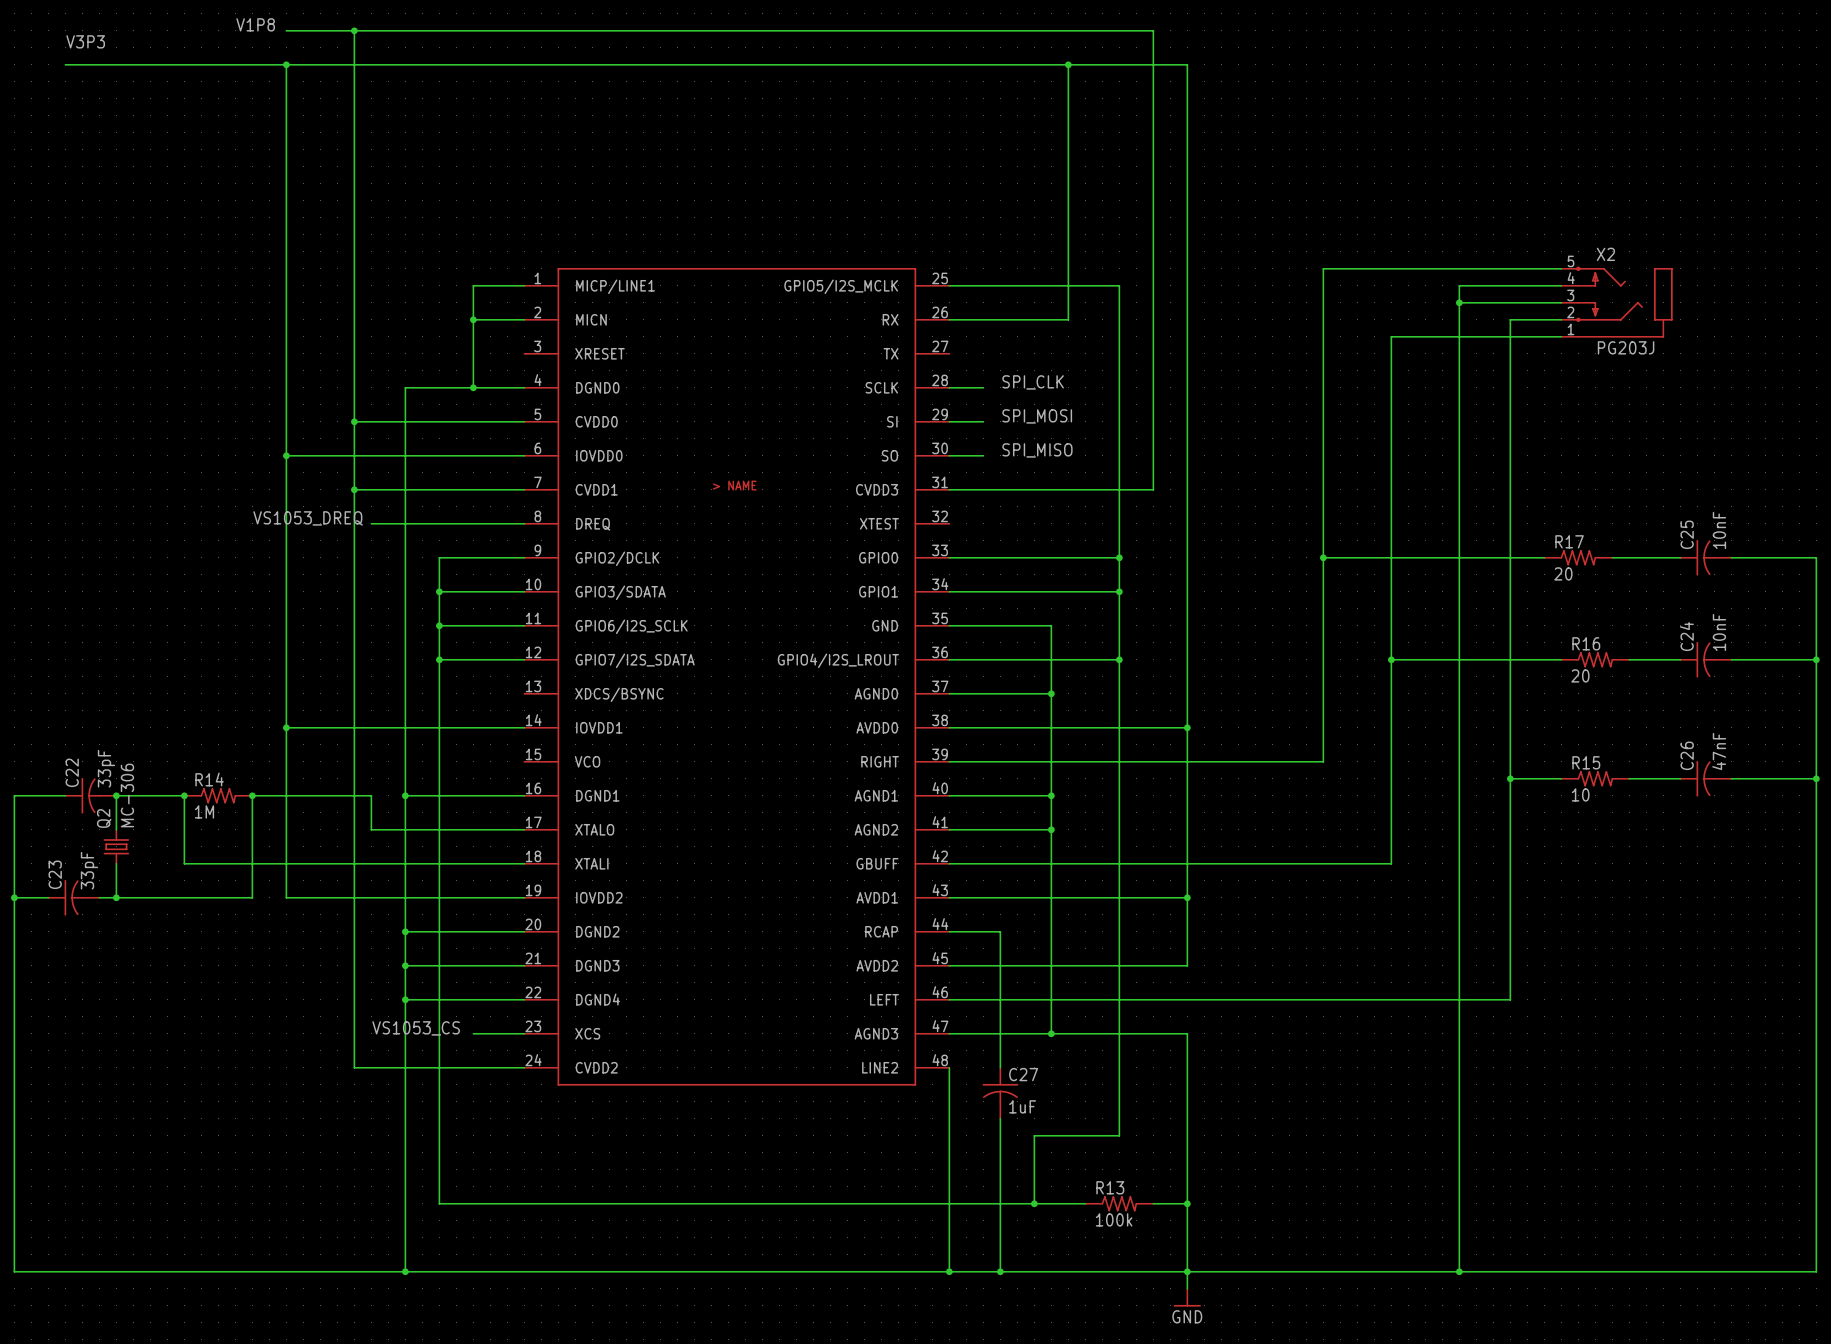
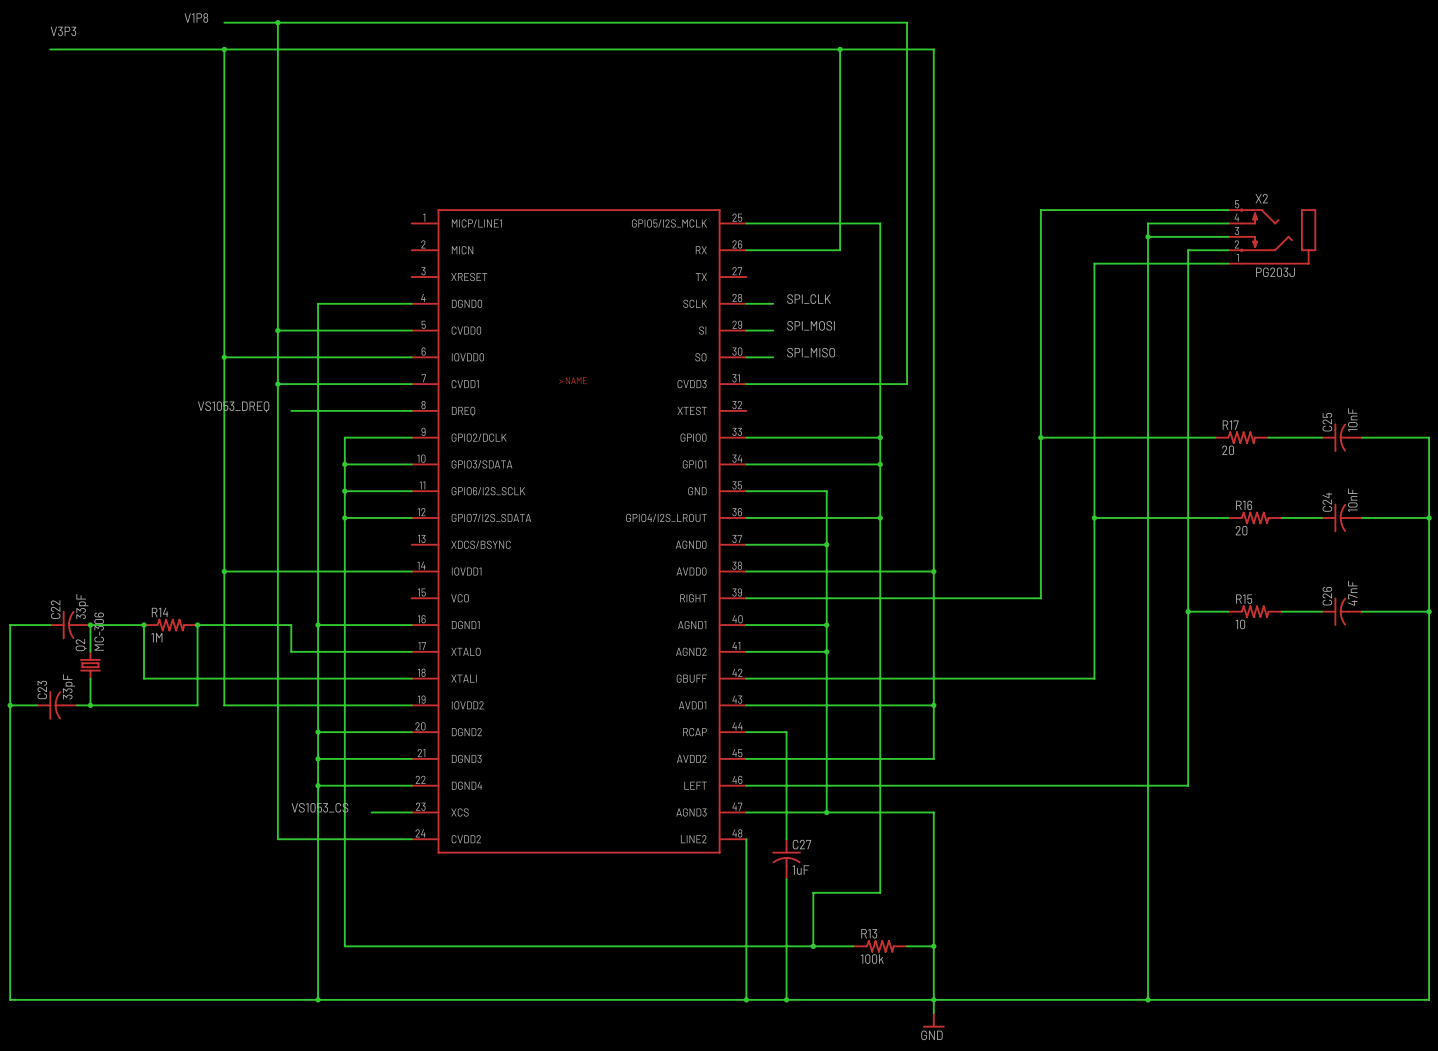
wire: (524, 285) (473, 285) (473, 387) -> none
wire: (473, 319) (524, 319) -> none
junction: (473, 319) -> none
junction: (473, 387) -> none

